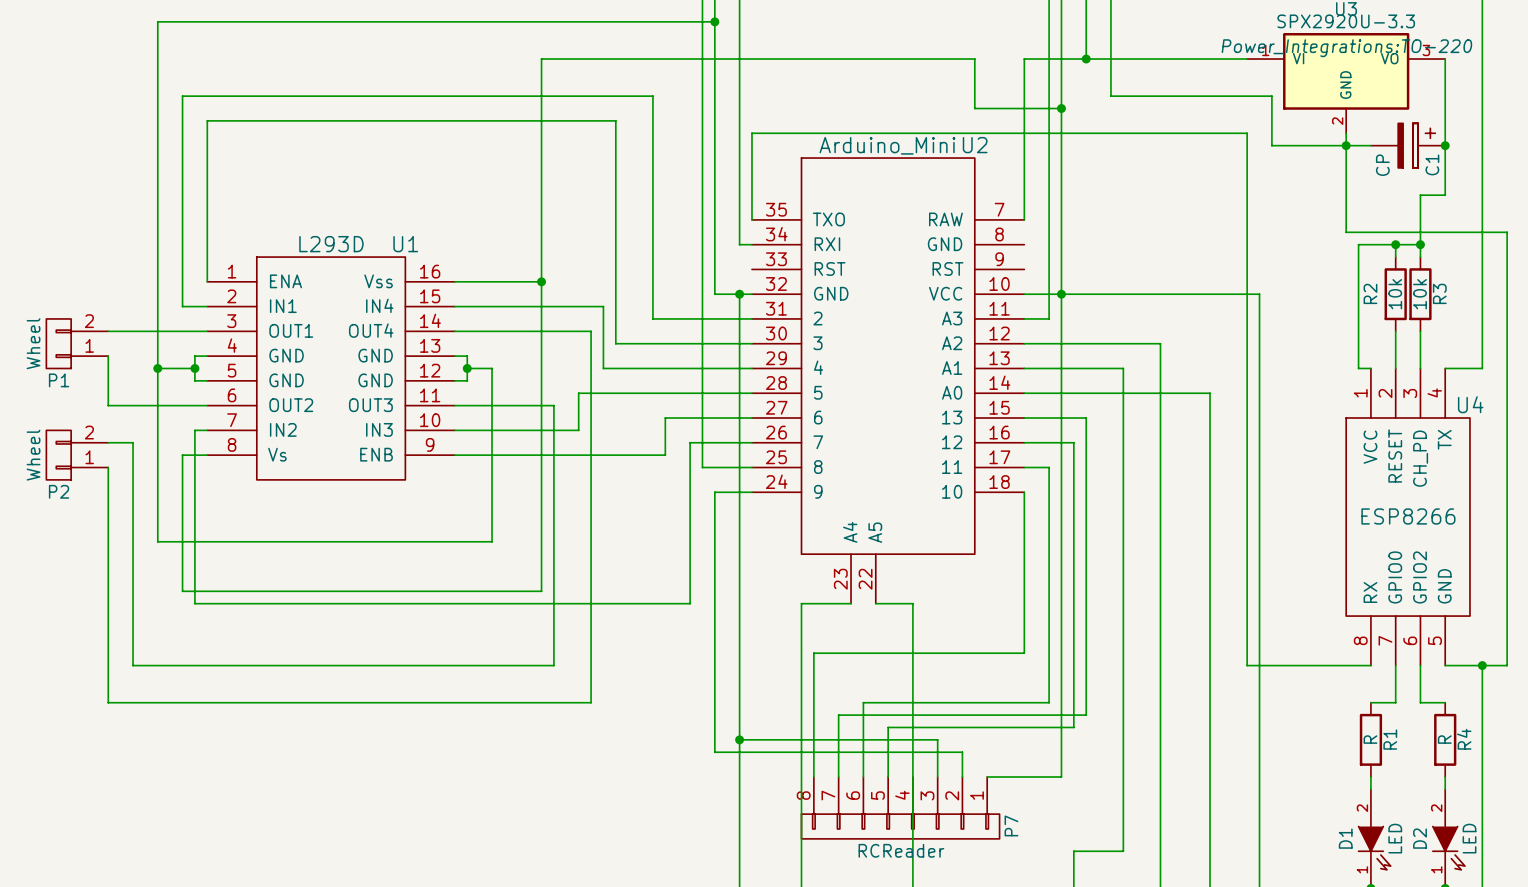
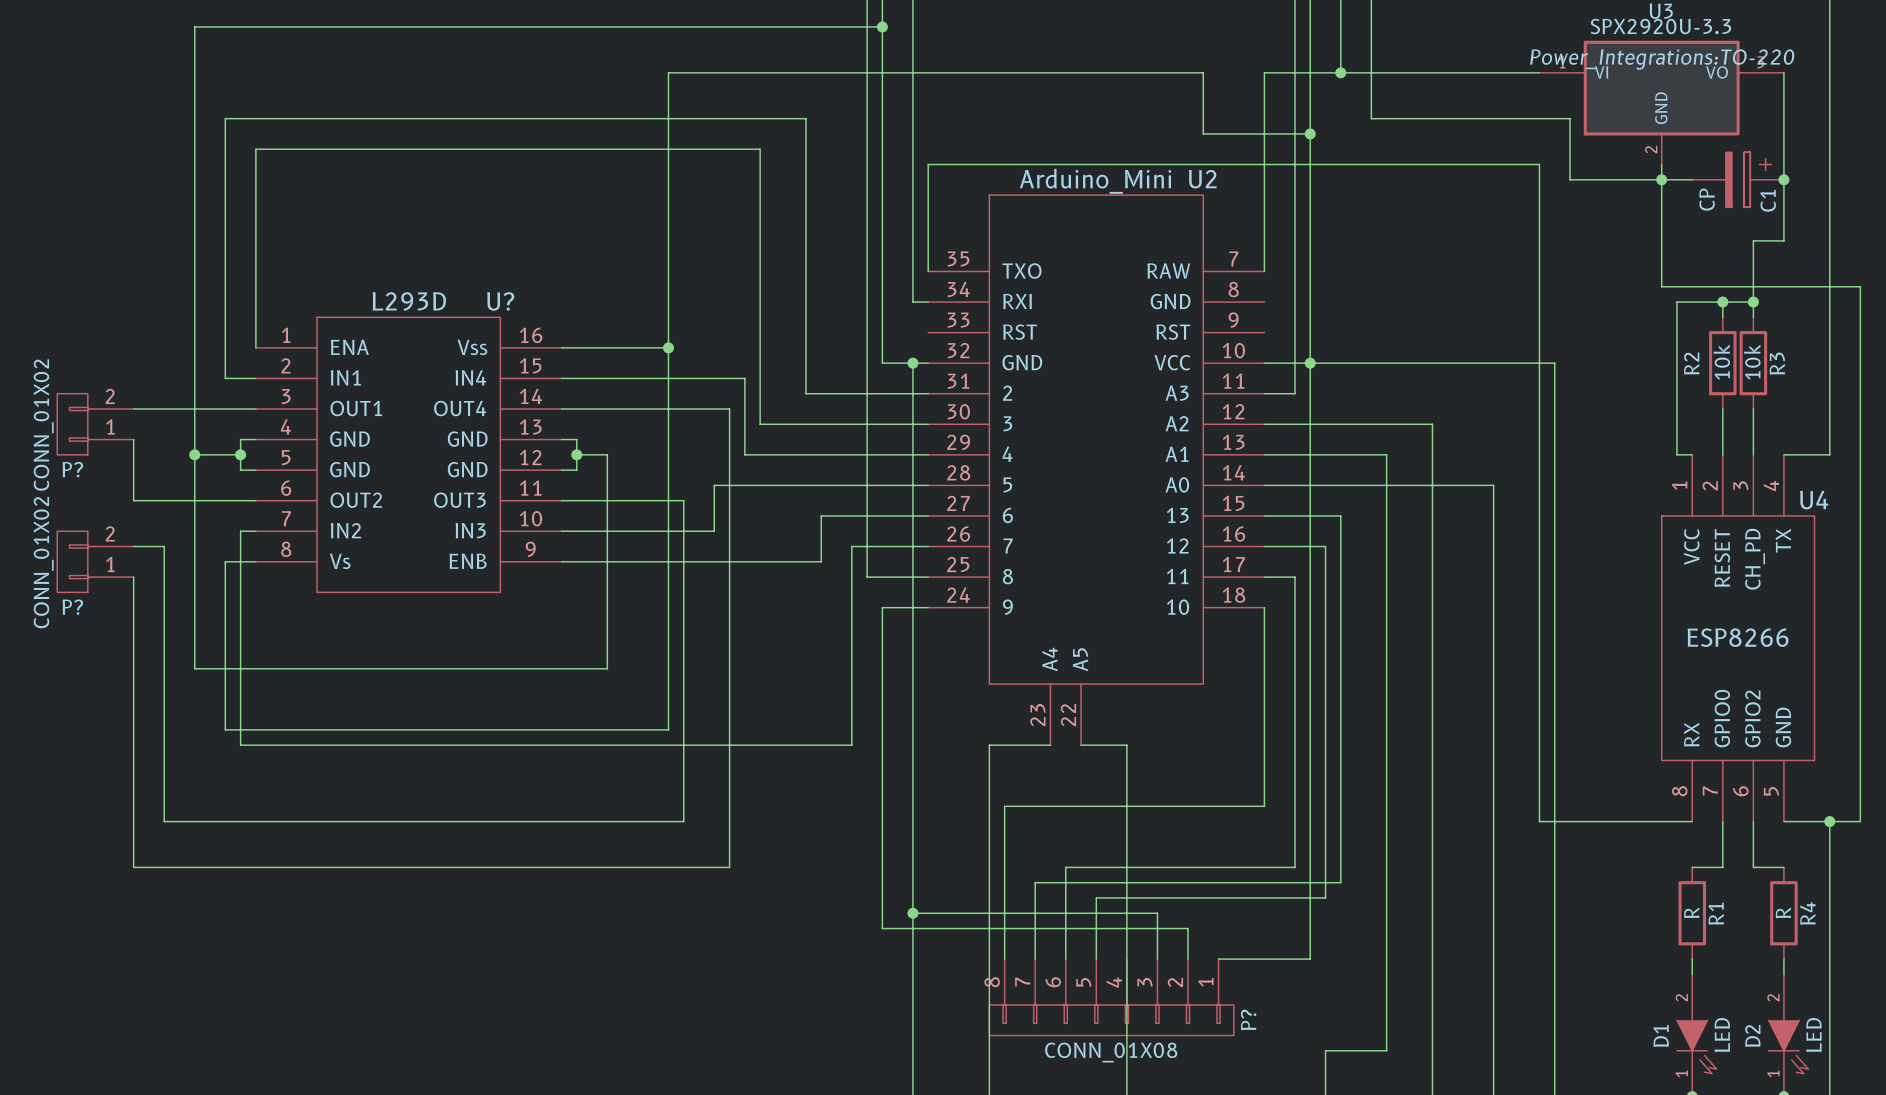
U1 name: U1 (405, 244) -> U? (500, 301)
P1 value: Wheel (33, 343) -> CONN_01X02 (43, 425)
P1 name: P1 (59, 380) -> P? (72, 469)
P2 value: Wheel (33, 455) -> CONN_01X02 (43, 562)
P2 name: P2 (59, 491) -> P? (72, 607)
P7 name: P7 (1011, 825) -> P? (1248, 1019)
P7 value: RCReader (901, 850) -> CONN_01X08 (1111, 1052)

